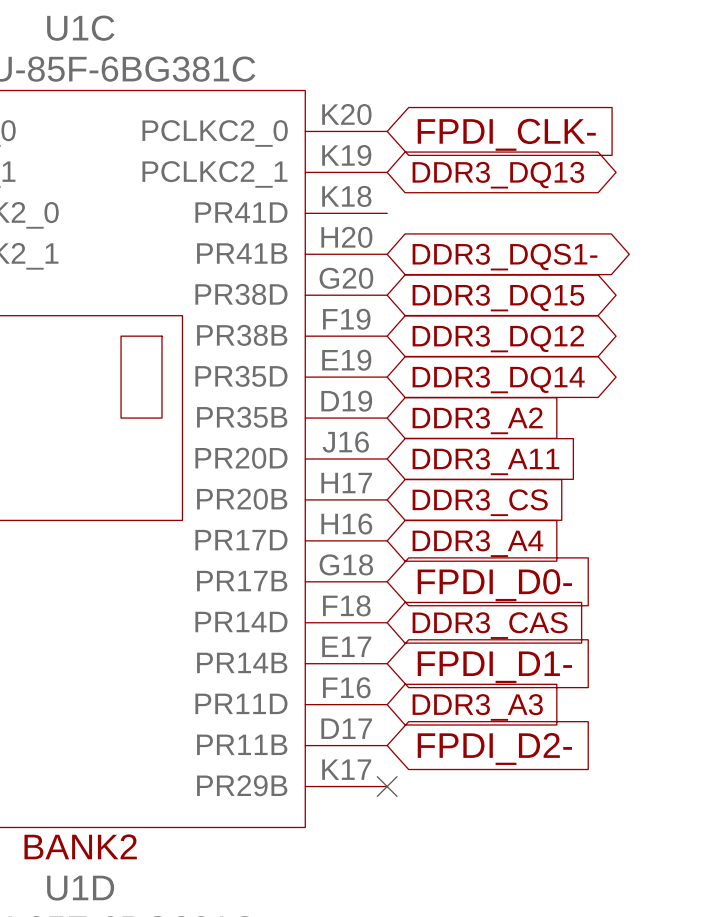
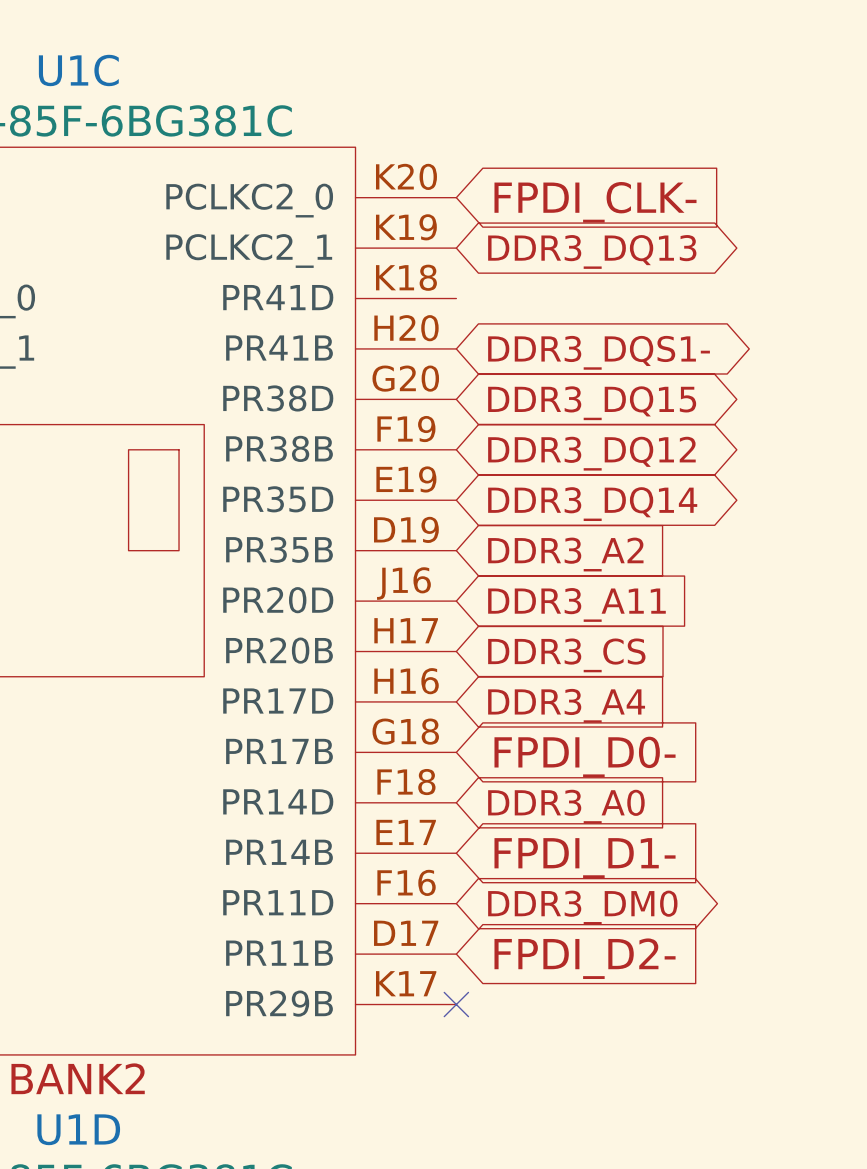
global label: DDR3_CAS (490, 625) -> DDR3_A0 (566, 806)
global label shape: input (477, 707) -> bidirectional (582, 907)
global label: DDR3_A3 (477, 707) -> DDR3_DM0 (582, 907)

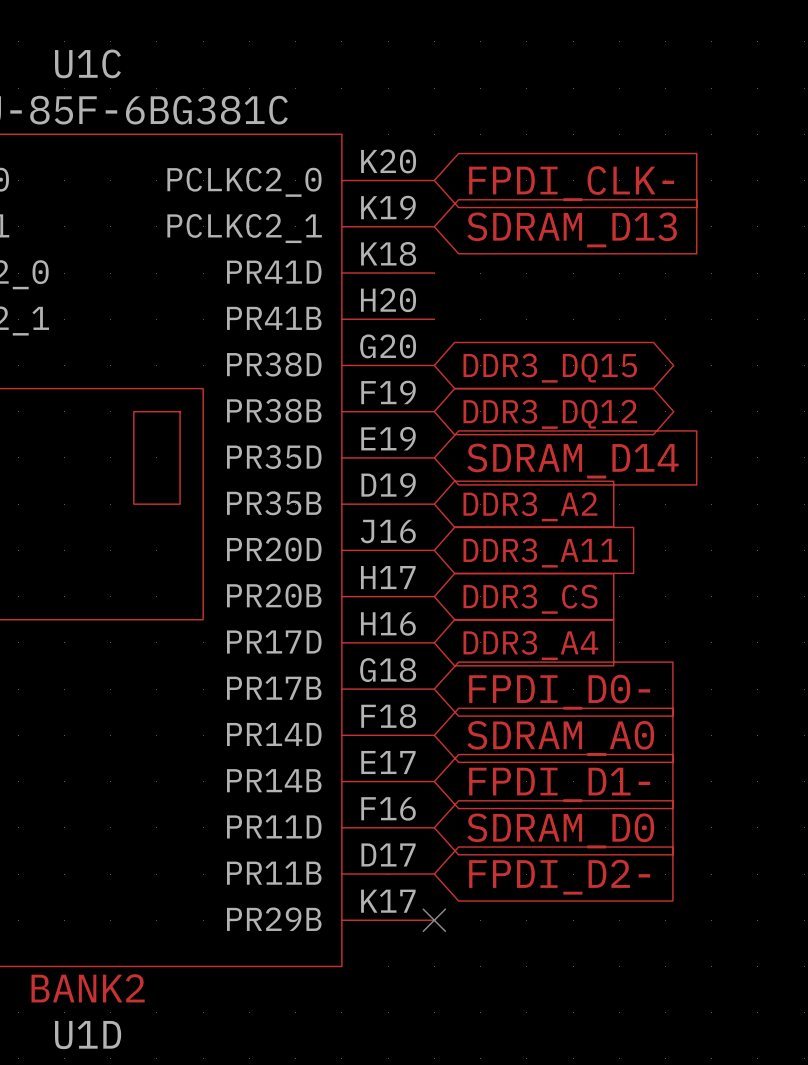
global label shape: bidirectional (592, 251) -> input (572, 229)
global label: DDR3_DQ13 (592, 251) -> SDRAM_D13 (572, 229)
global label: DDR3_DQS1- (599, 352) -> none
global label shape: bidirectional (592, 504) -> input (573, 461)
global label: DDR3_DQ14 (592, 504) -> SDRAM_D14 (573, 461)
global label: DDR3_A0 (566, 806) -> SDRAM_A0 (560, 738)
global label shape: bidirectional (582, 907) -> input (560, 830)
global label: DDR3_DM0 (582, 907) -> SDRAM_D0 (560, 830)

